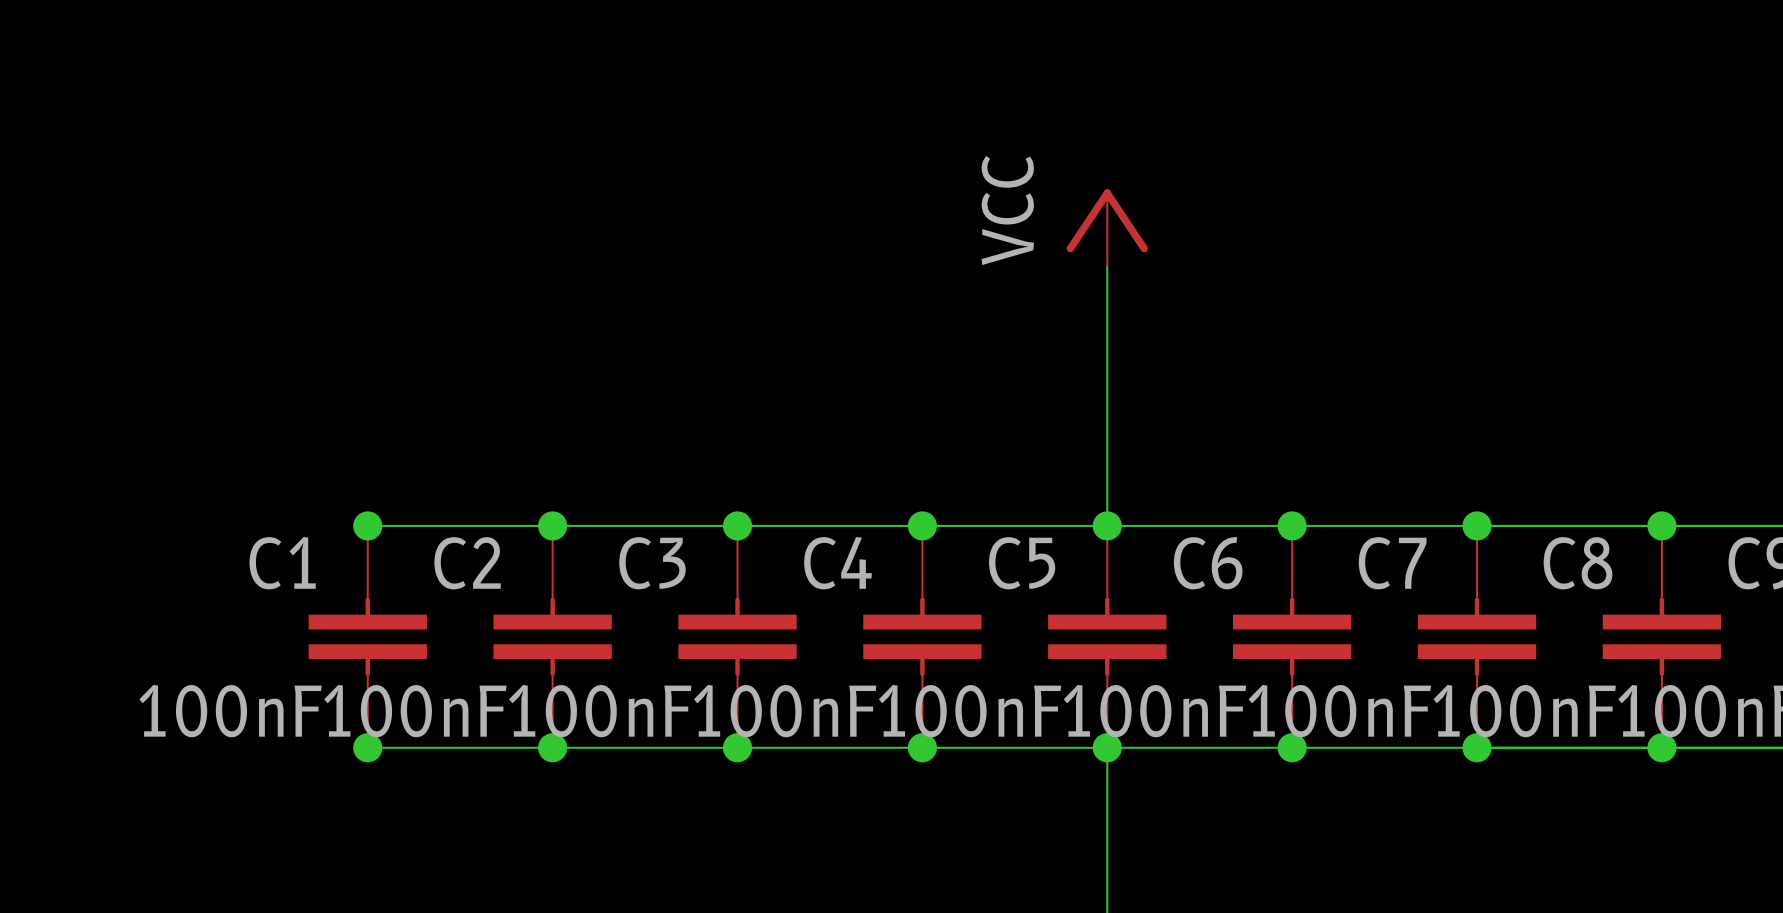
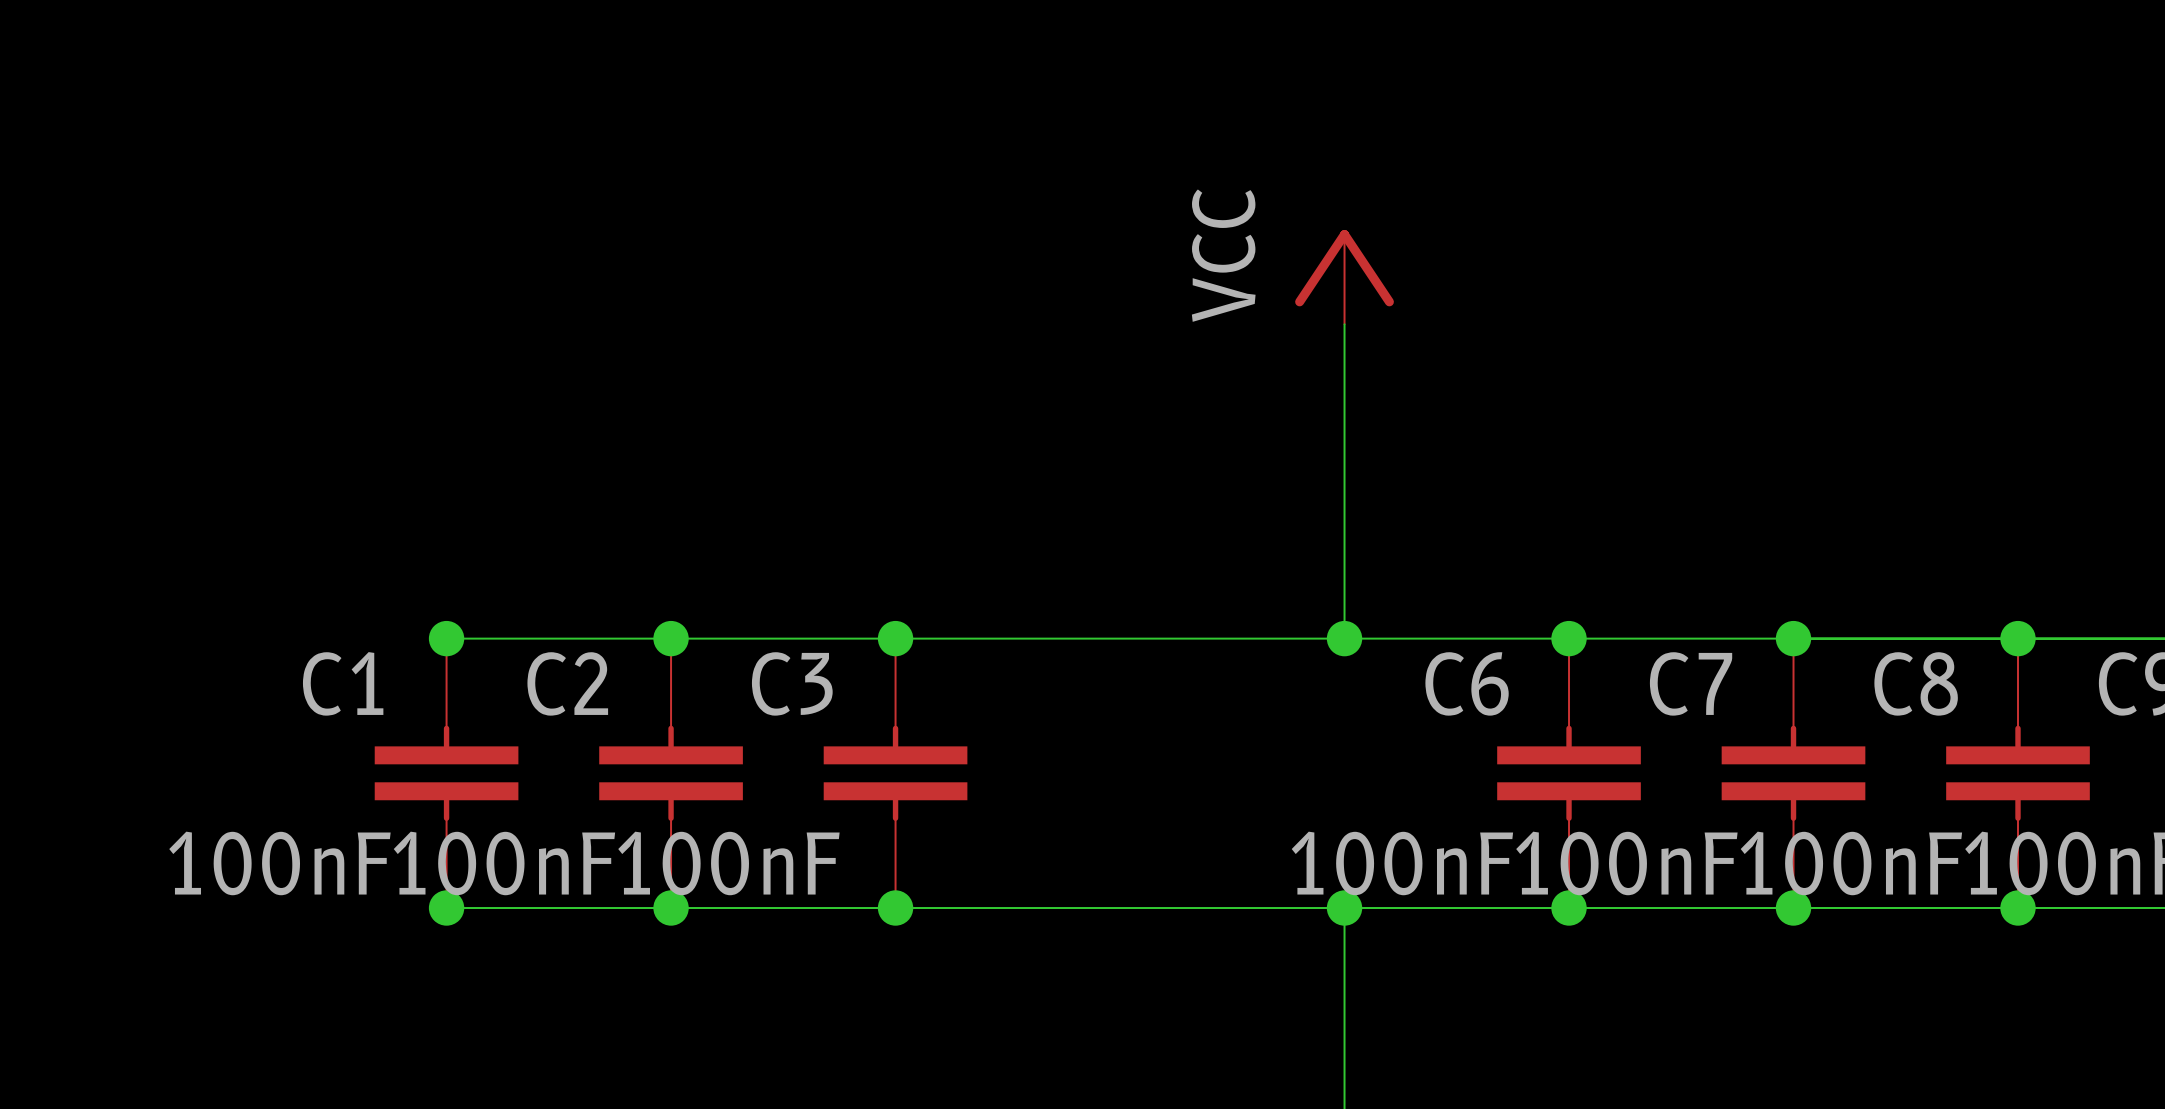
junction: (922, 525) -> none
C4: 100nF (922, 636) -> none
C5: 100nF (1107, 636) -> none
junction: (922, 747) -> none

